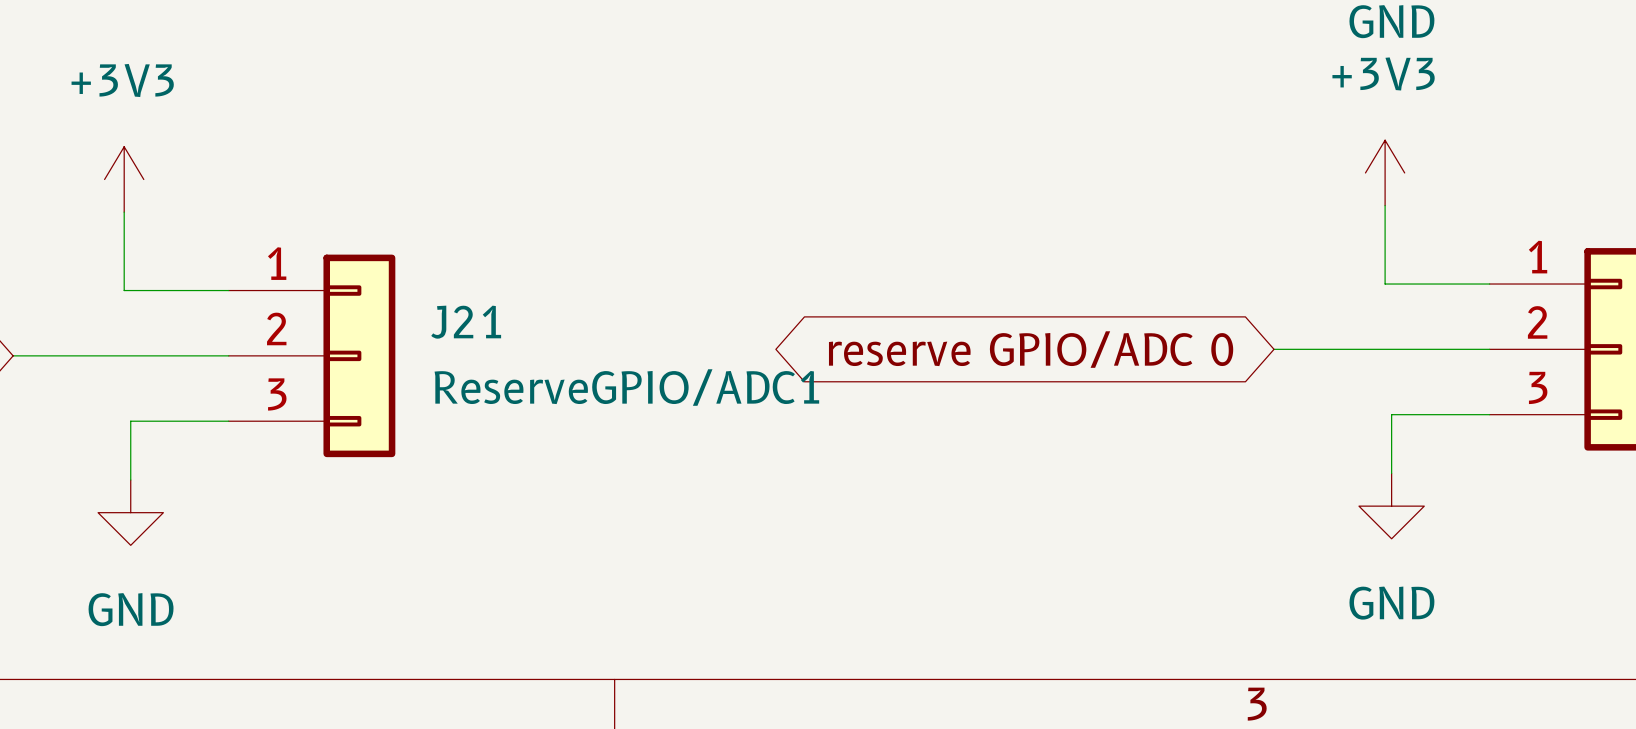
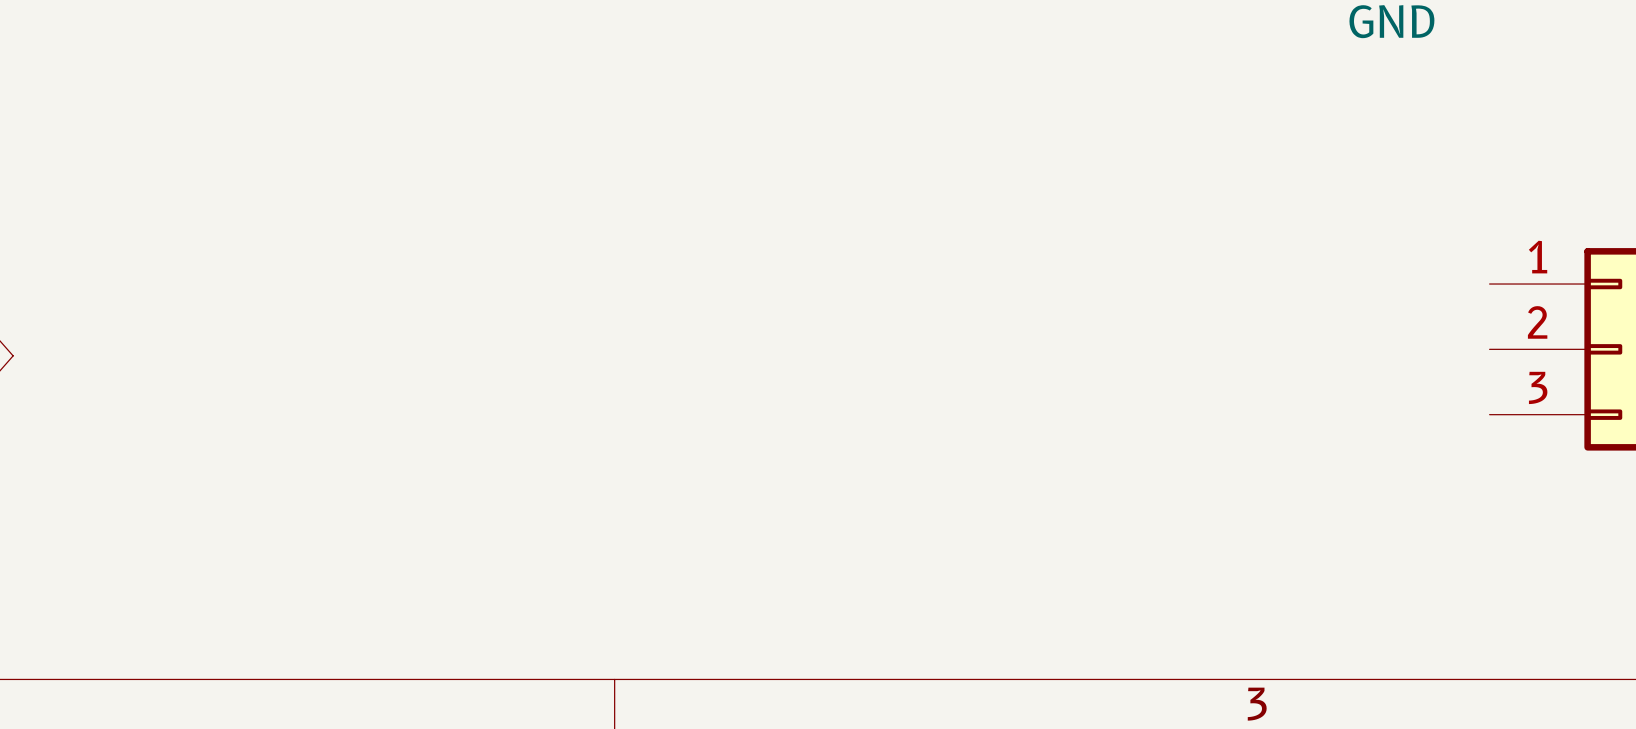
power symbol: +3V3 (1385, 172) -> none
power symbol: +3V3 (124, 179) -> none
wire: (1385, 205) (1385, 284) (1489, 284) -> none
wire: (124, 212) (124, 290) (228, 290) -> none
global label: reserve GPIO/ADC 0 (1031, 349) -> none
wire: (1274, 349) (1489, 349) -> none
wire: (13, 355) (228, 355) -> none
J21: ReserveGPIO/ADC1 (312, 355) -> none
wire: (1489, 414) (1391, 414) (1391, 473) -> none
wire: (228, 421) (130, 421) (130, 480) -> none
power symbol: GND (1391, 506) -> none
power symbol: GND (130, 512) -> none

